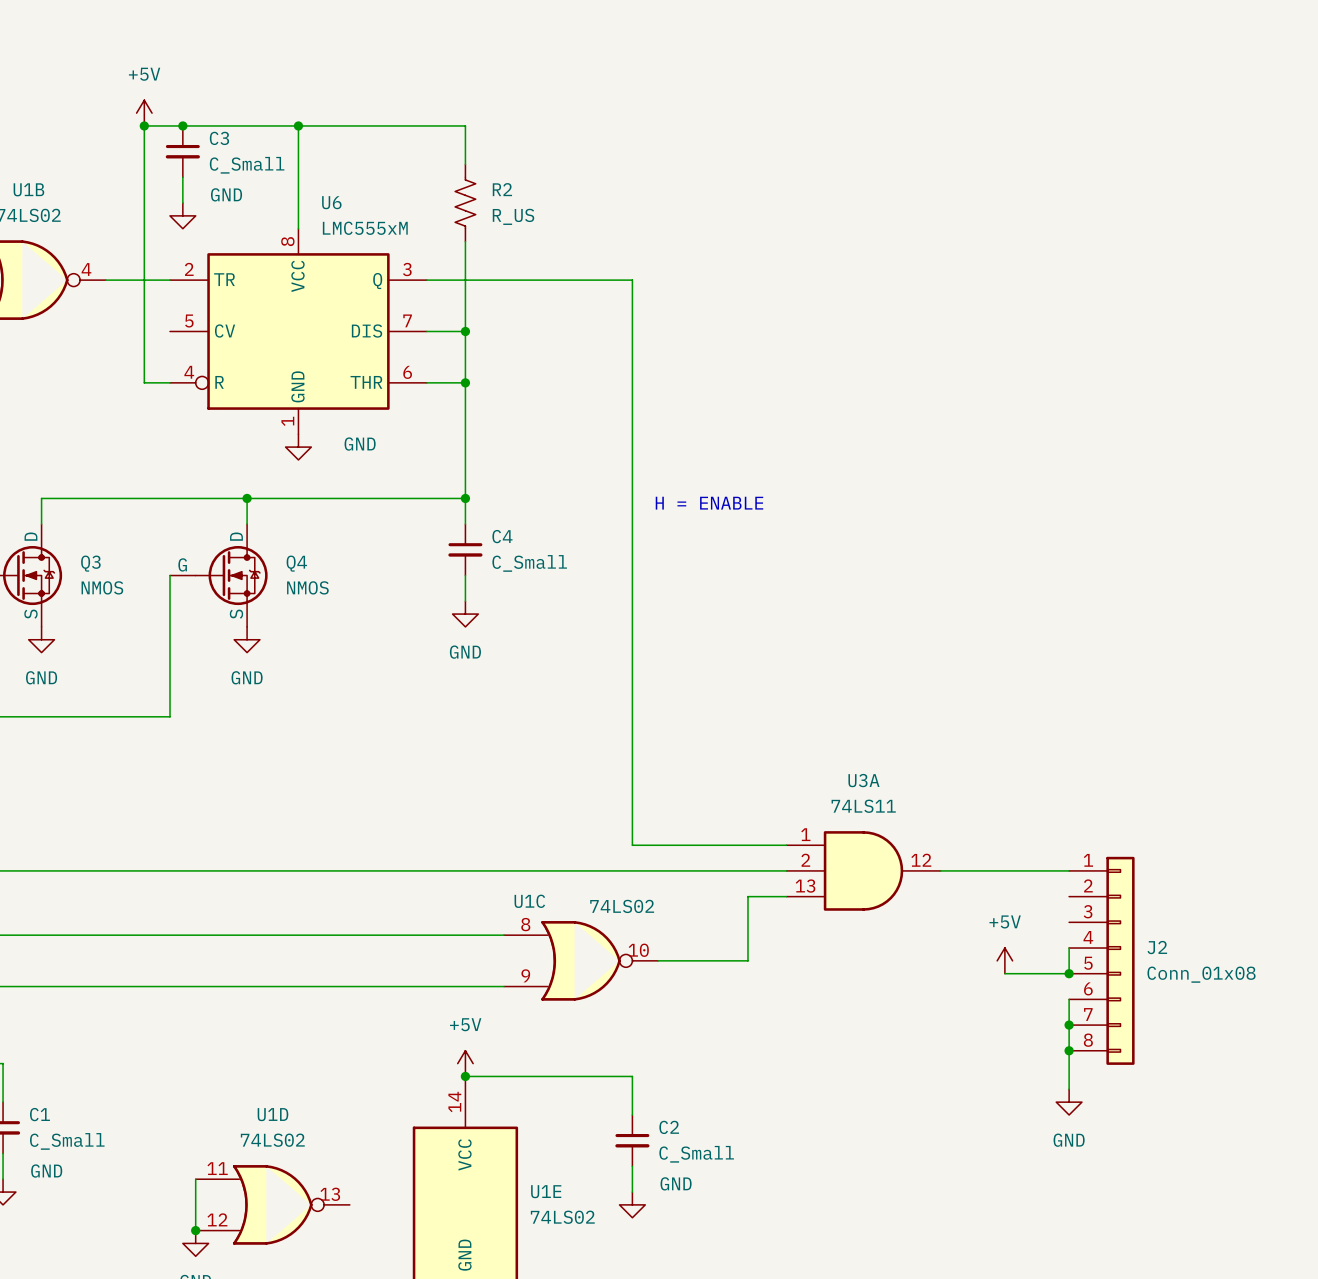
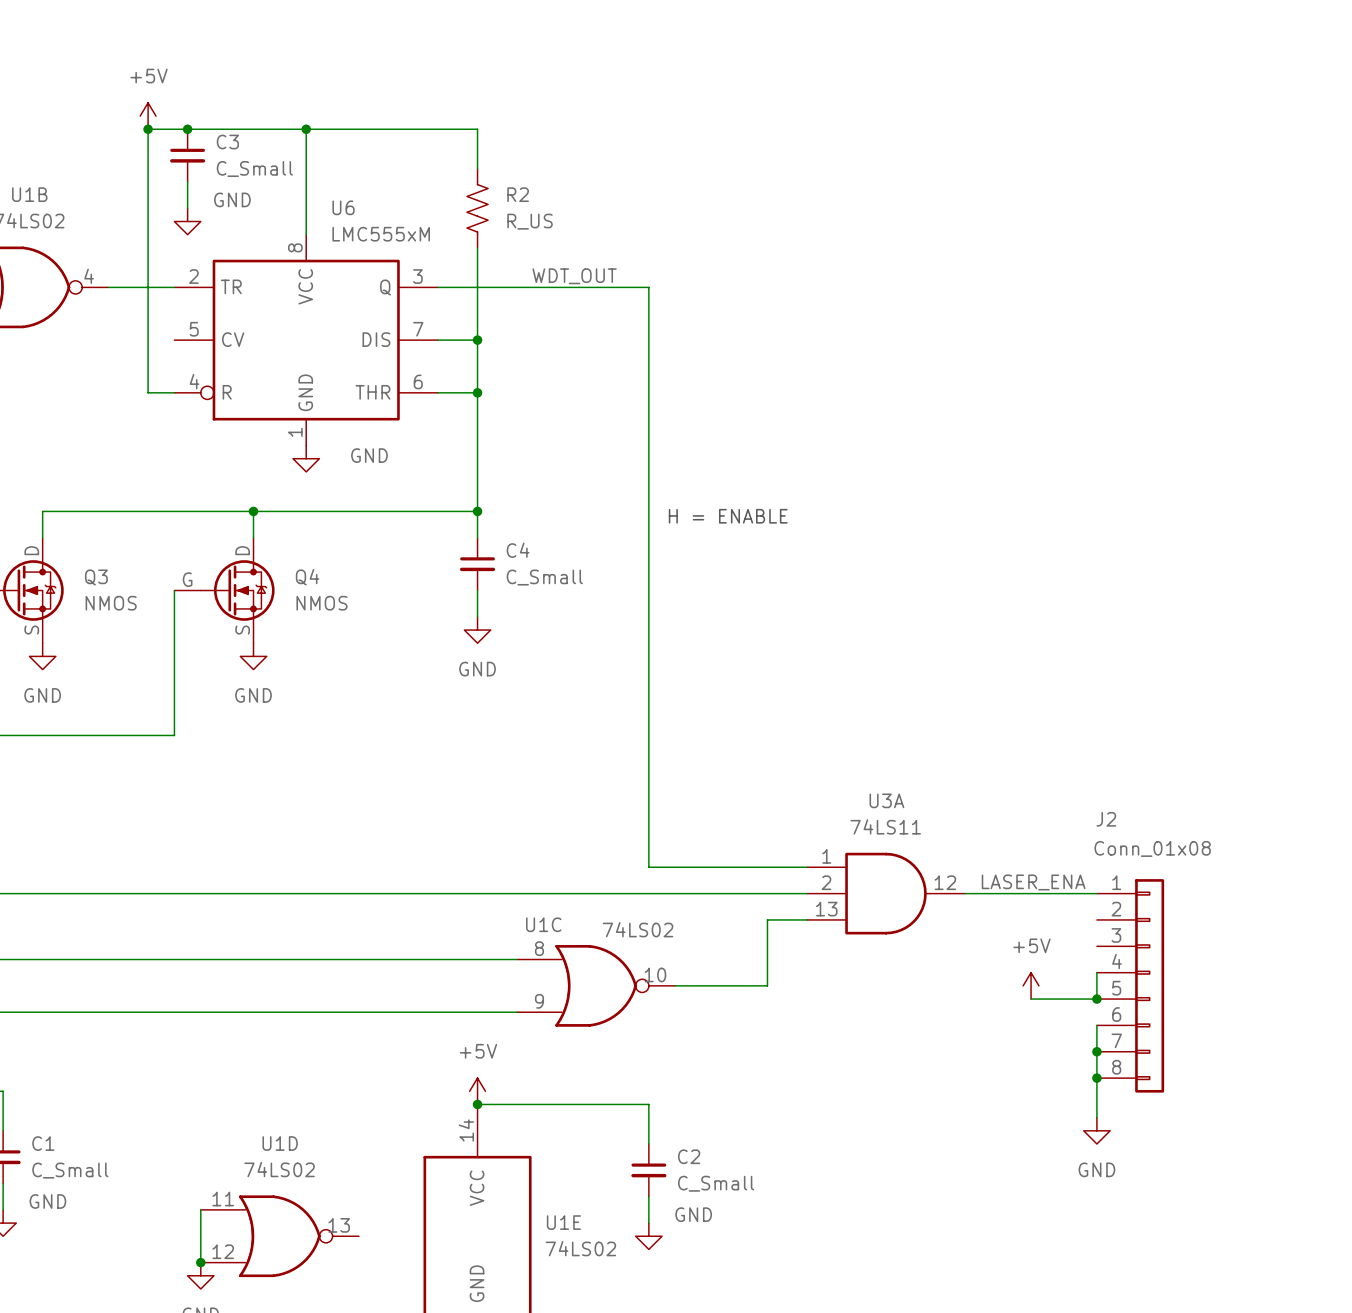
label: none -> WDT_OUT (574, 276)
label: none -> LASER_ENA (1033, 882)
J2 name position: J2 (1157, 947) -> J2 (1106, 819)
J2 value position: Conn_01x08 (1201, 974) -> Conn_01x08 (1152, 848)

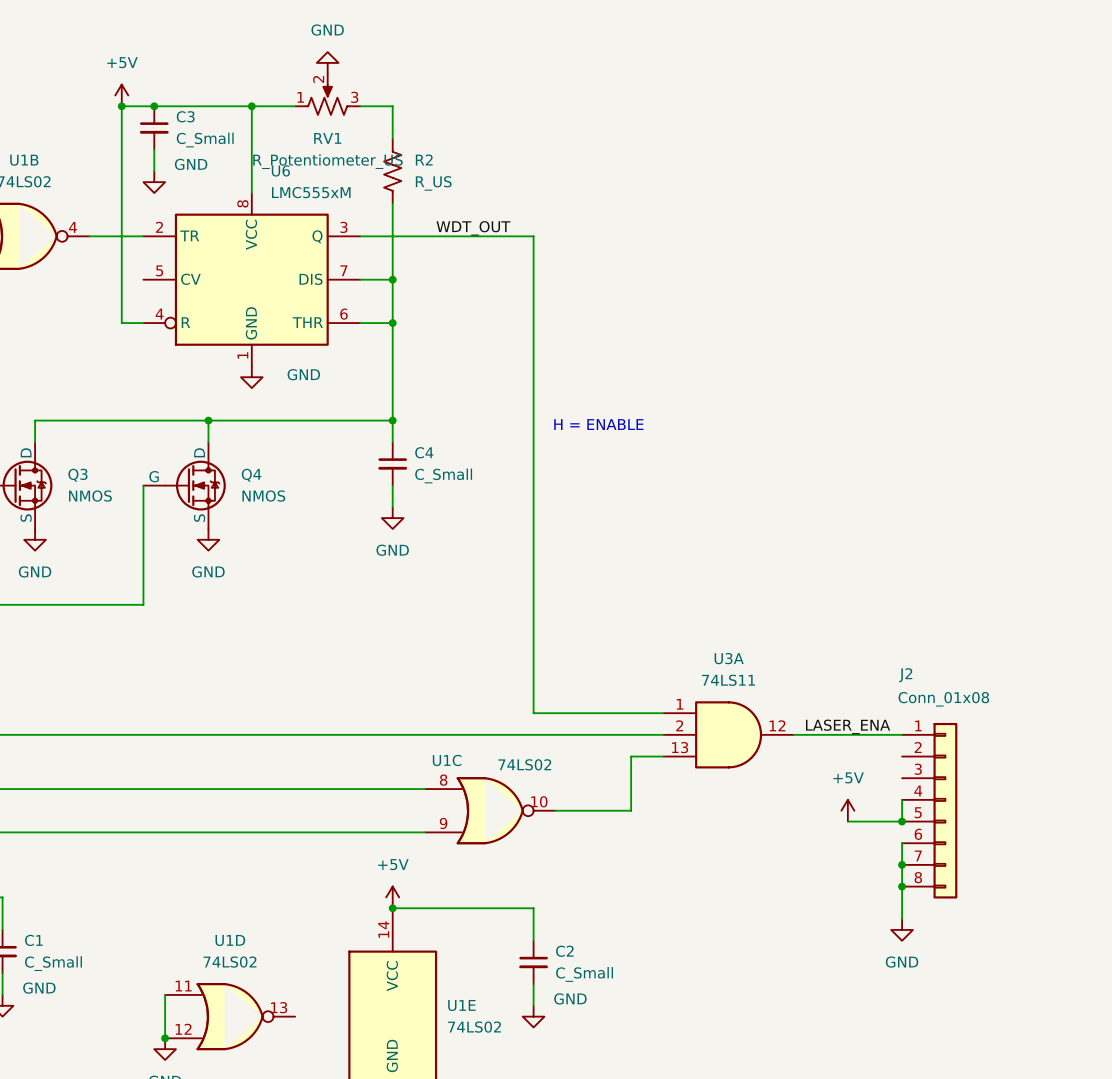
power symbol: none -> GND (327, 62)
RV1: none -> R_Potentiometer_US (327, 94)

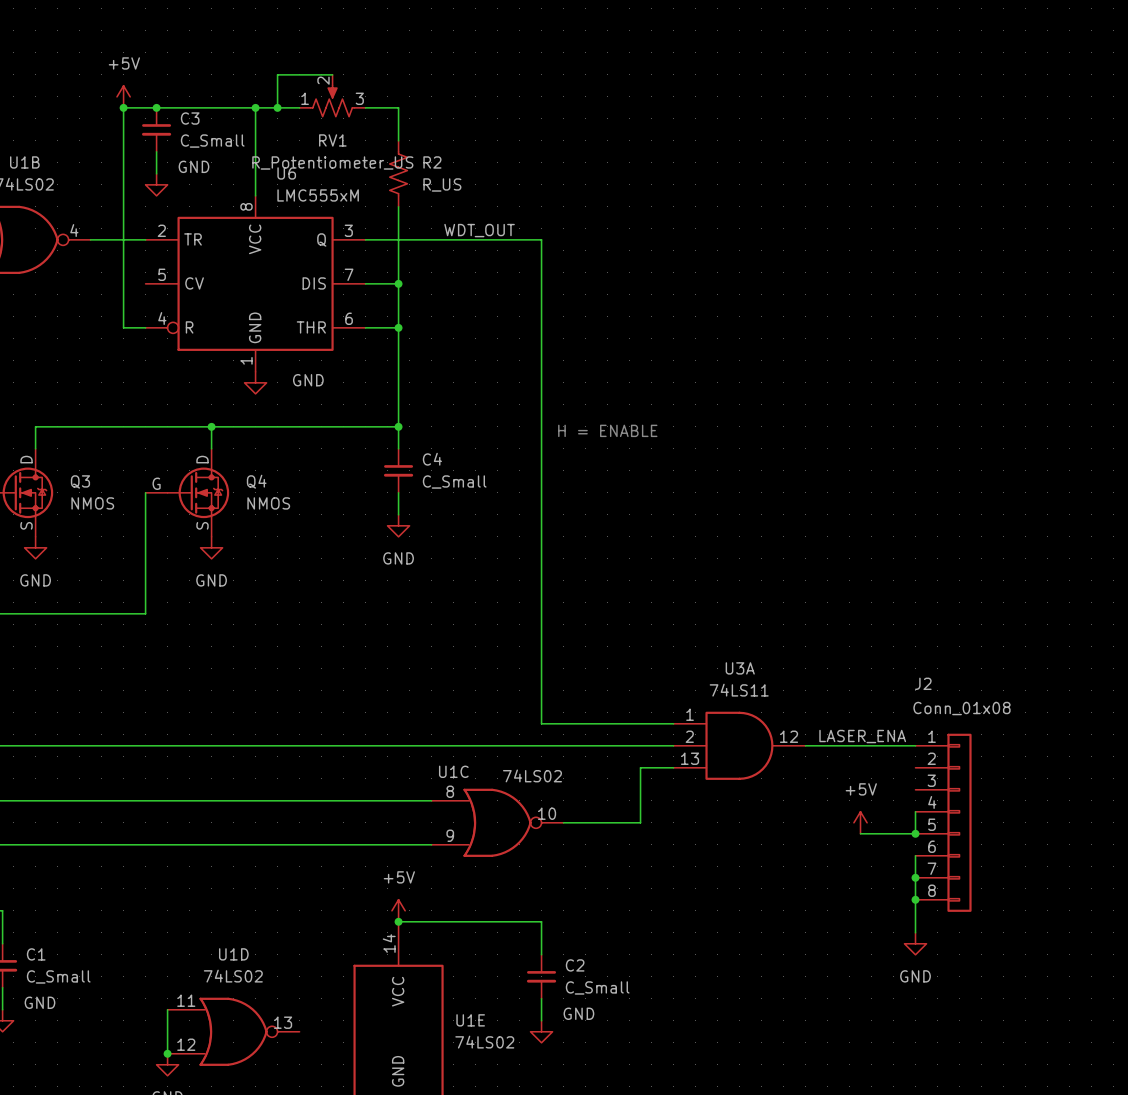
power symbol: GND (327, 62) -> none
wire: none -> (332, 74) (277, 74) (277, 107)
junction: none -> (277, 107)

